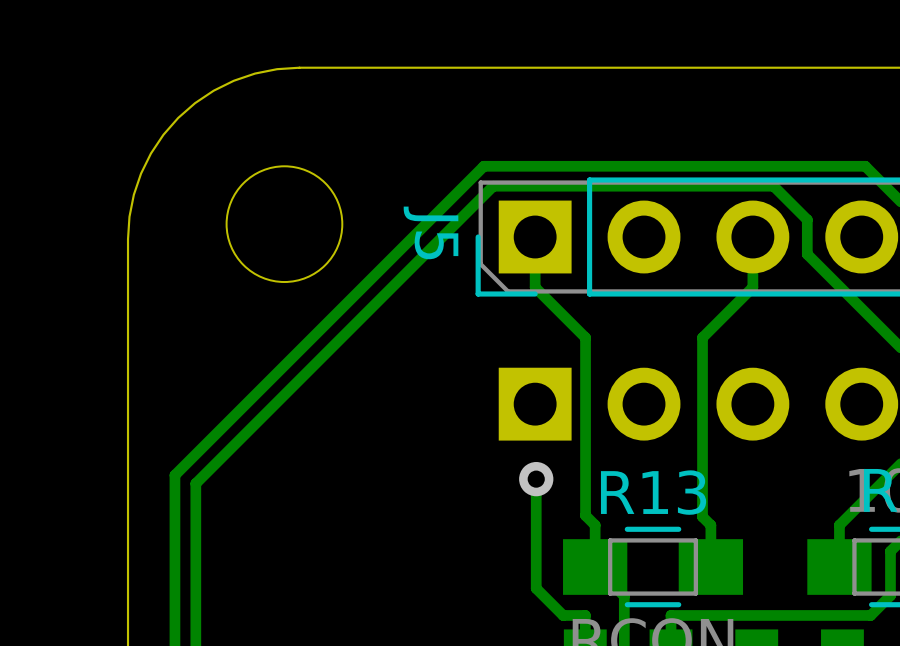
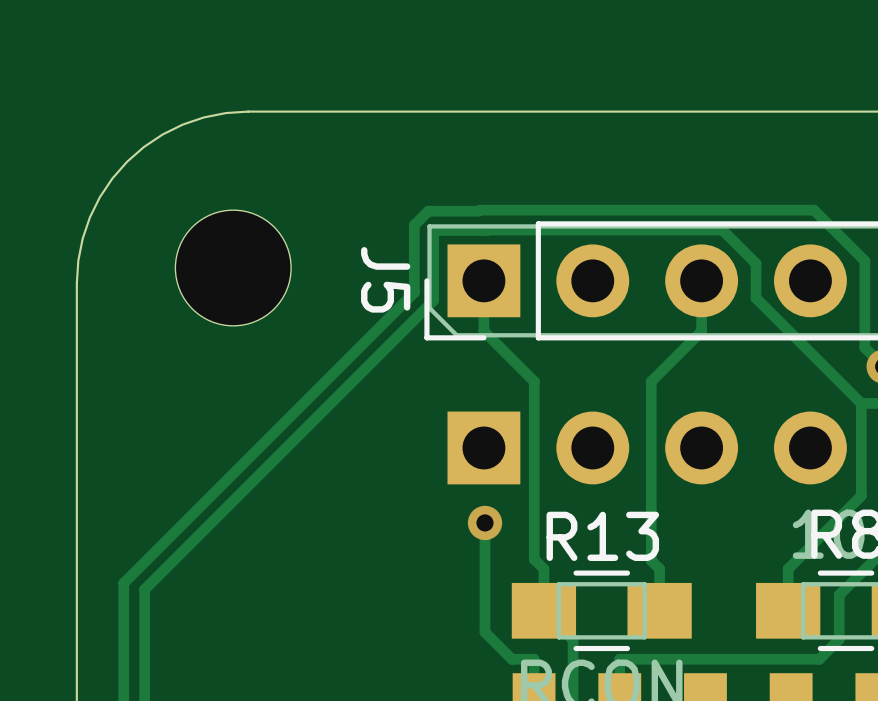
track: (530, 166) (483, 166) (174, 475) (174, 539) -> (478, 211) (428, 211) (414, 225) (414, 292) (123, 583)
track: (538, 186) (493, 186) (195, 483) (195, 545) -> (486, 230) (436, 230) (433, 233) (433, 300) (144, 589)

